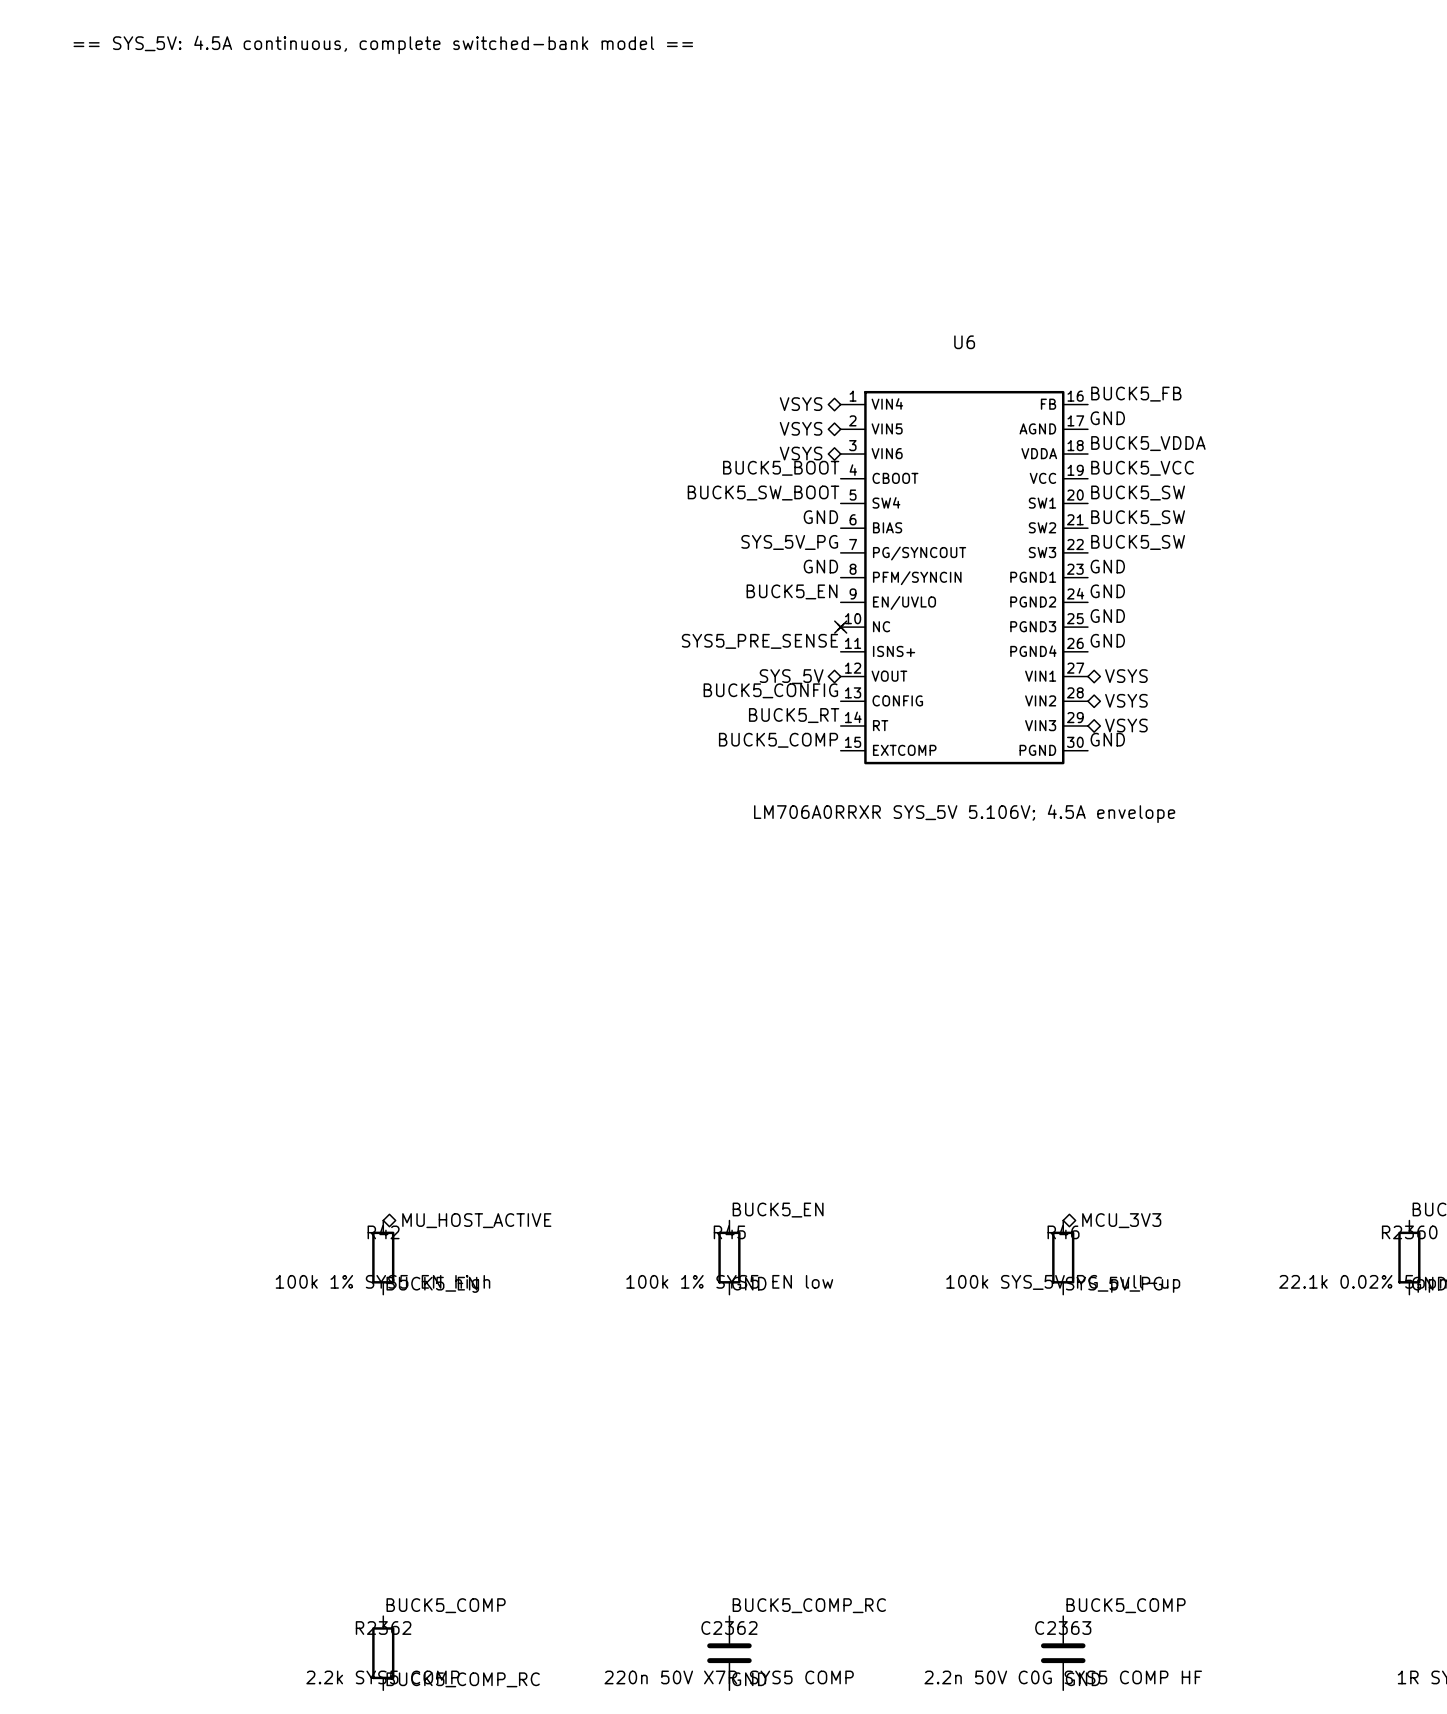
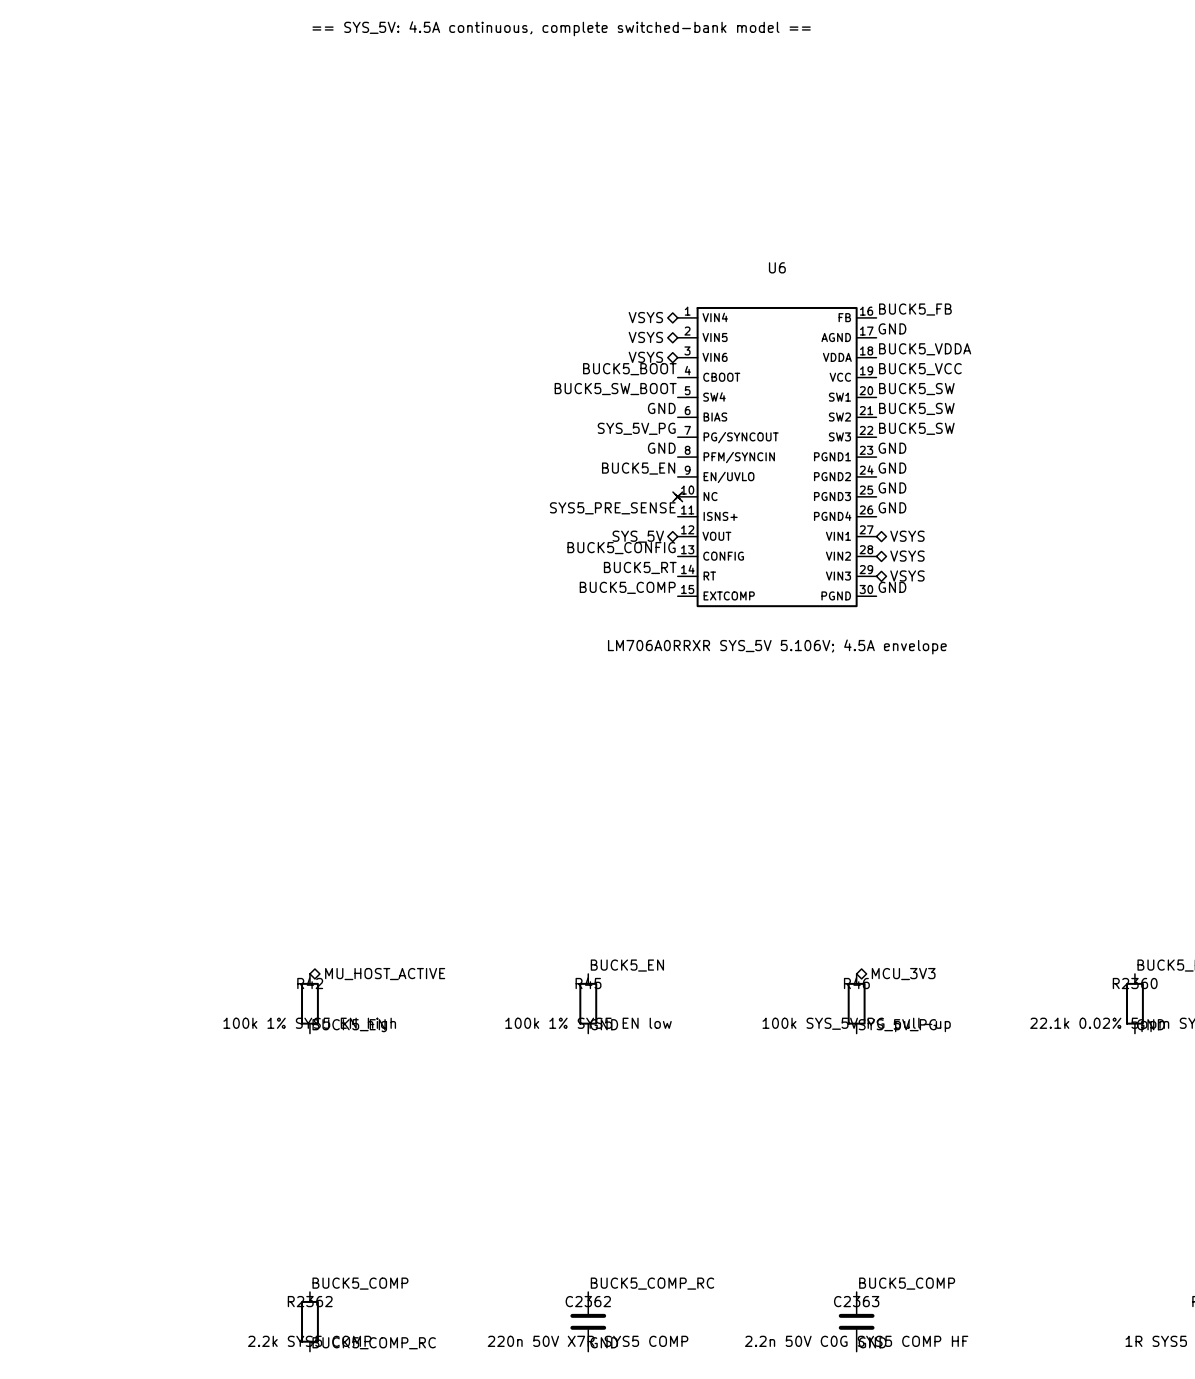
text position: == SYS_5V: 4.5A continuous, complete switched-bank model == (383, 44) -> == SYS_5V: 4.5A continuous, complete switched-bank model == (561, 28)

